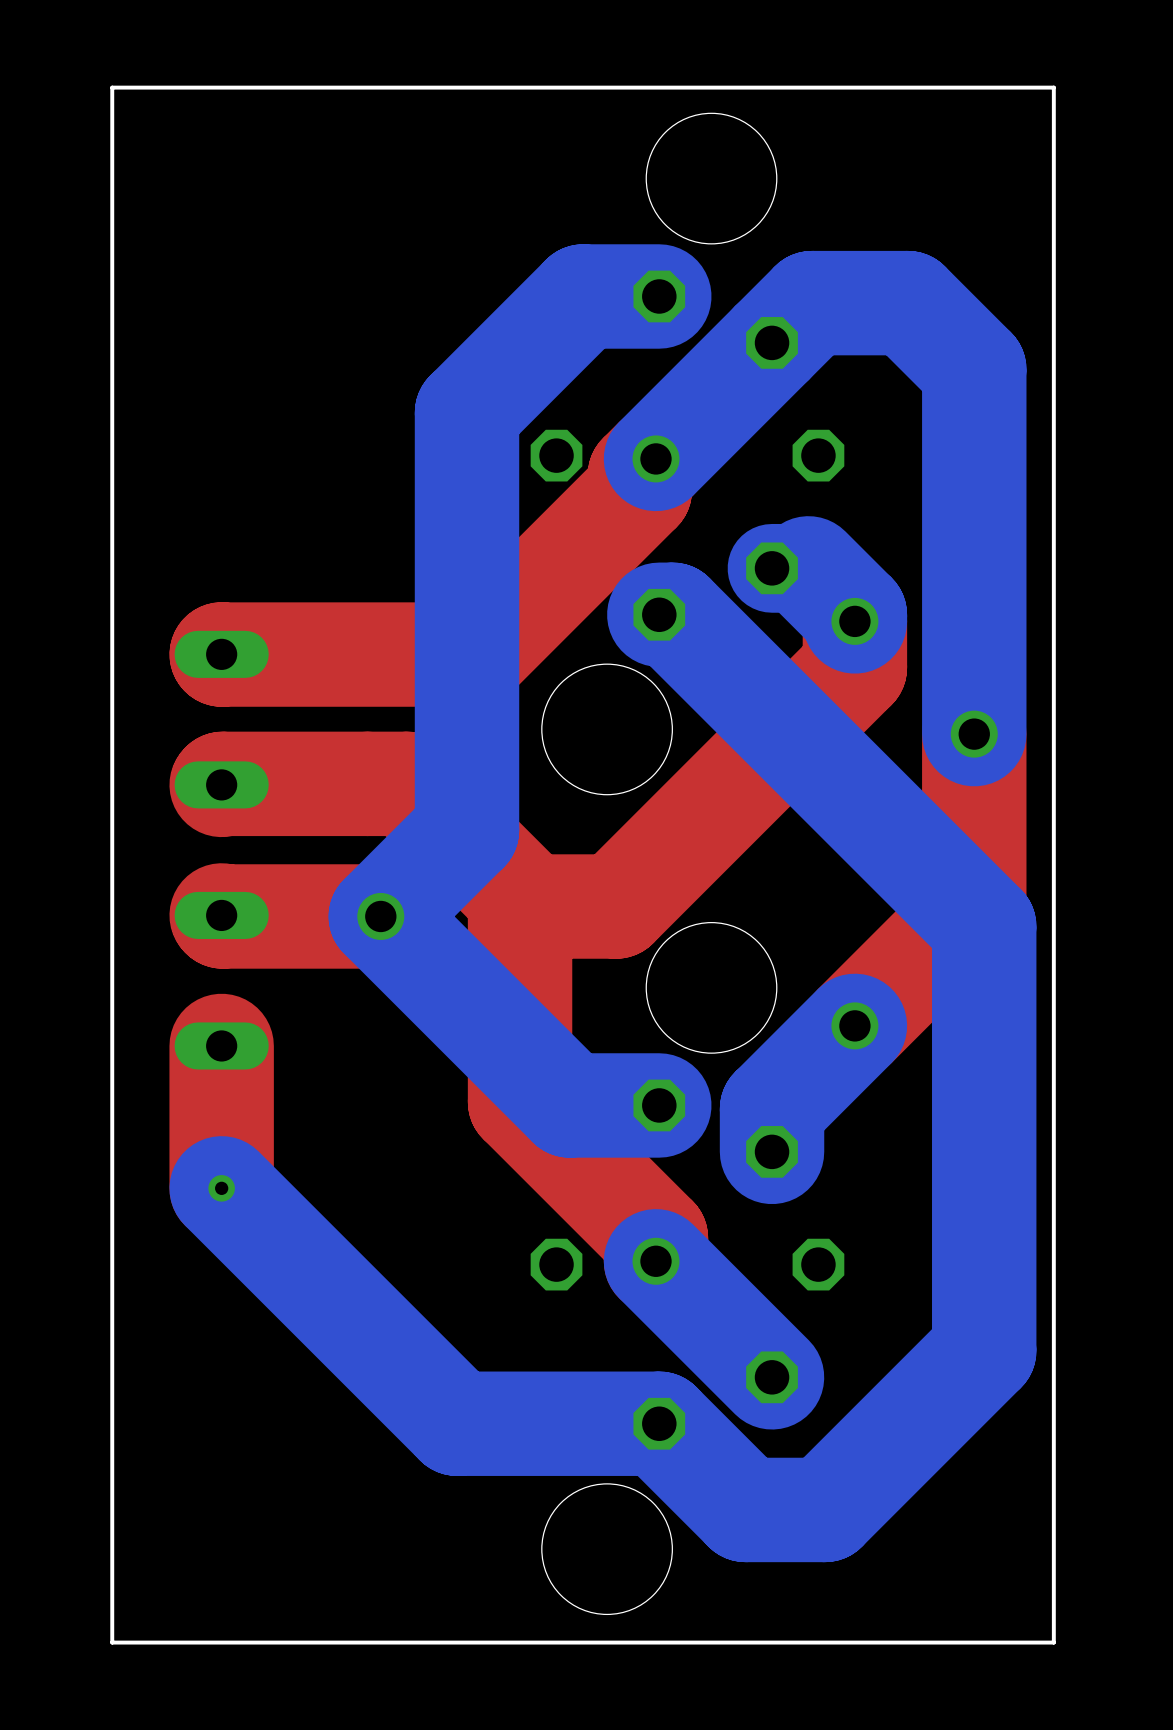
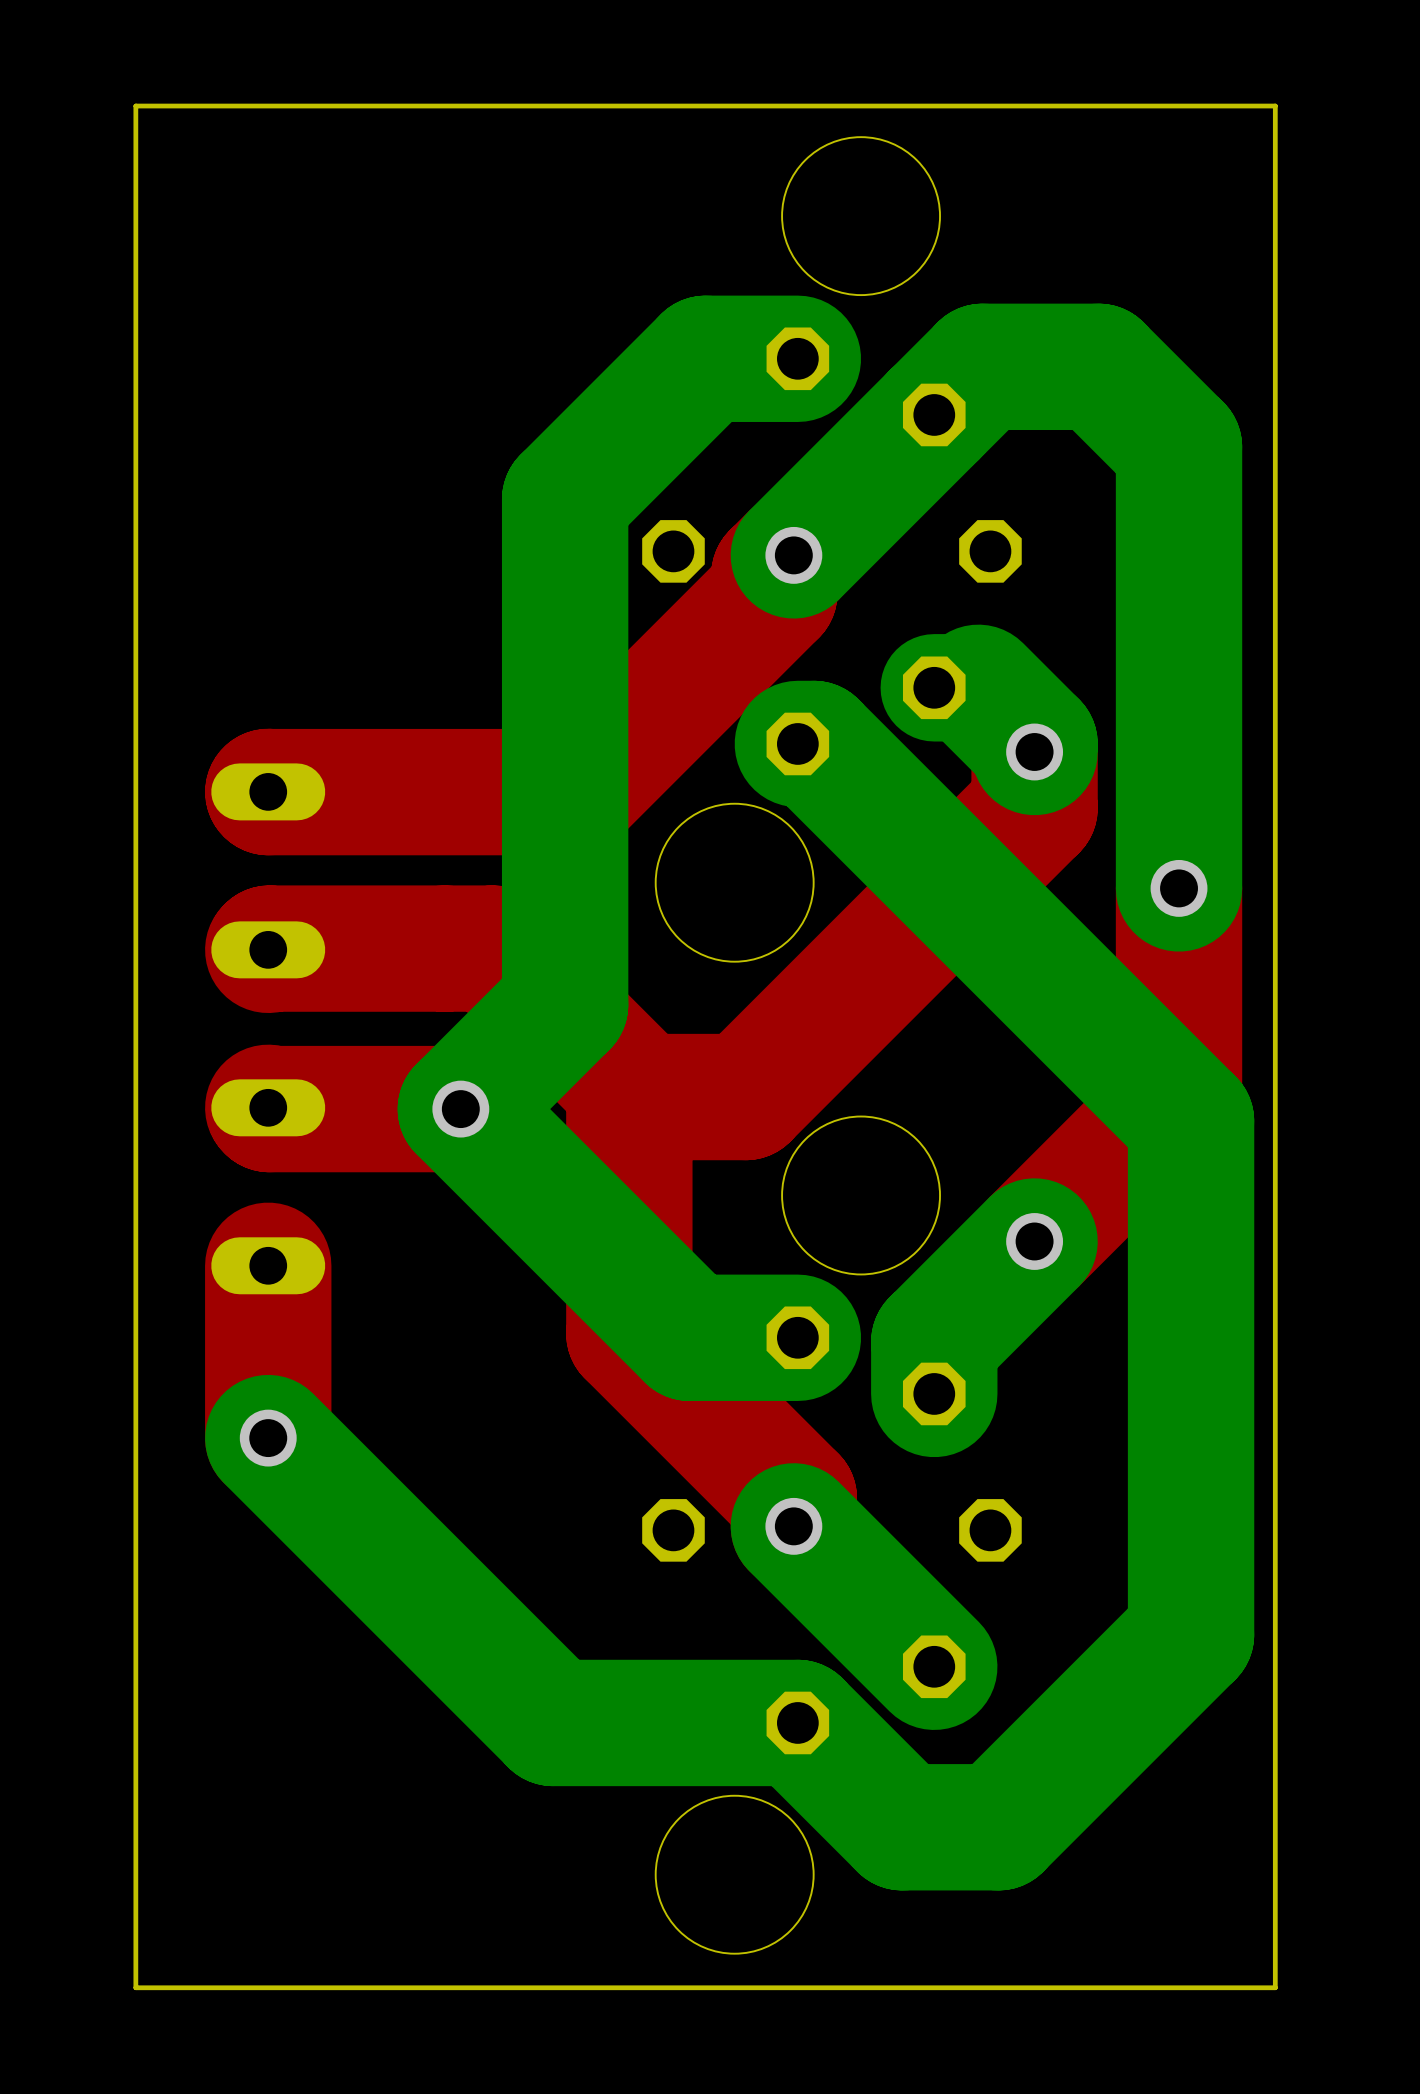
via size: [208, 1175, 235, 1202] -> [239, 1409, 297, 1467]

